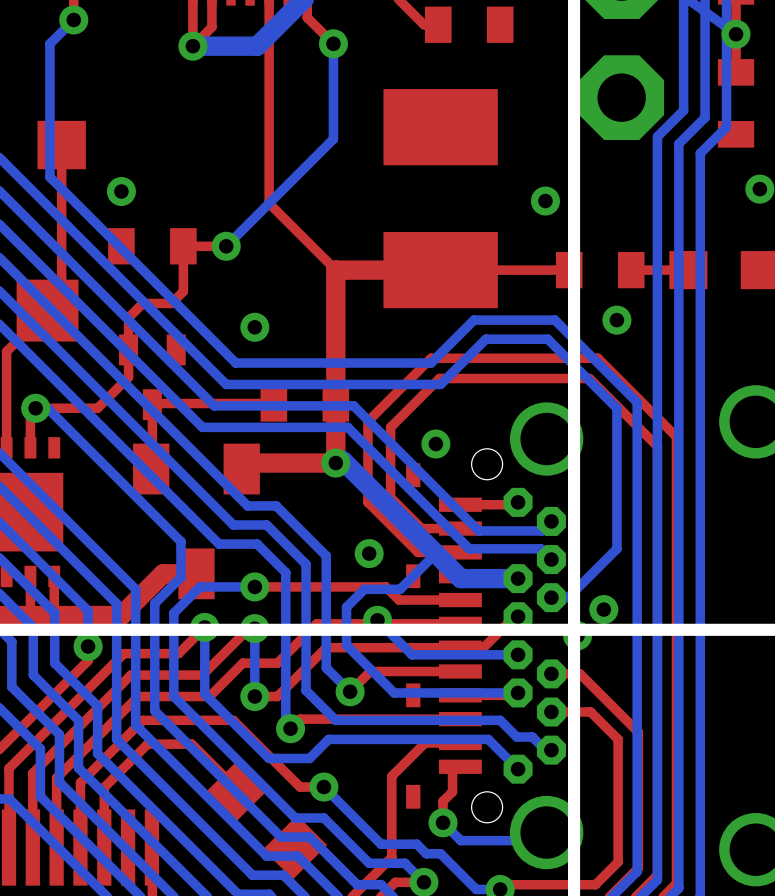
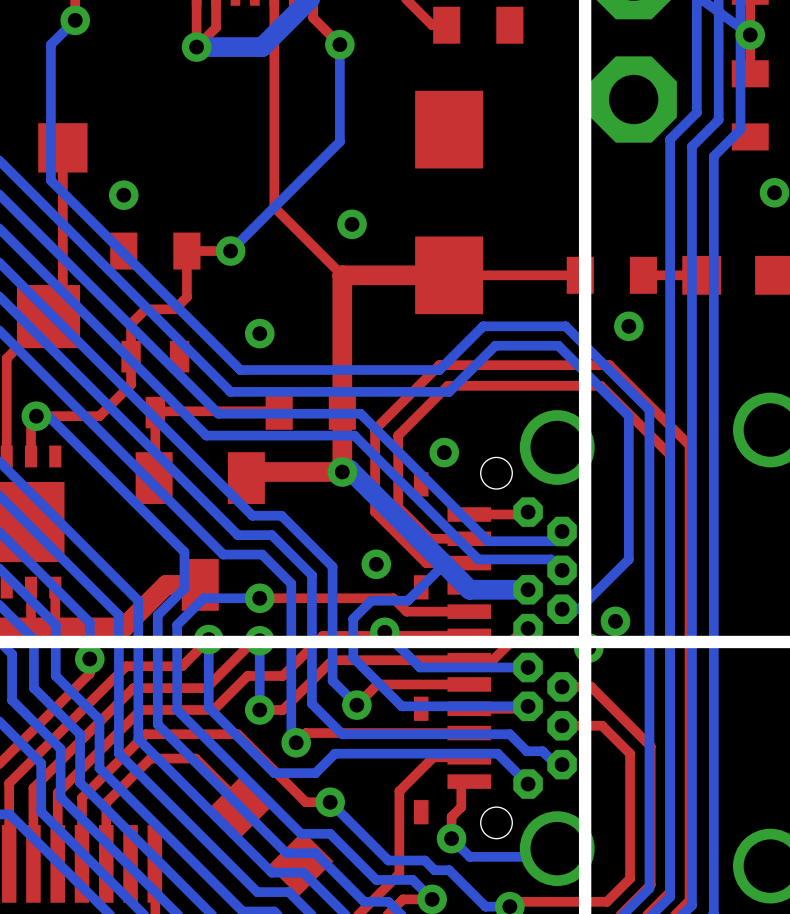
part footprint: [383, 89, 498, 309] -> [415, 90, 484, 315]
via position: (545, 201) -> (352, 224)

